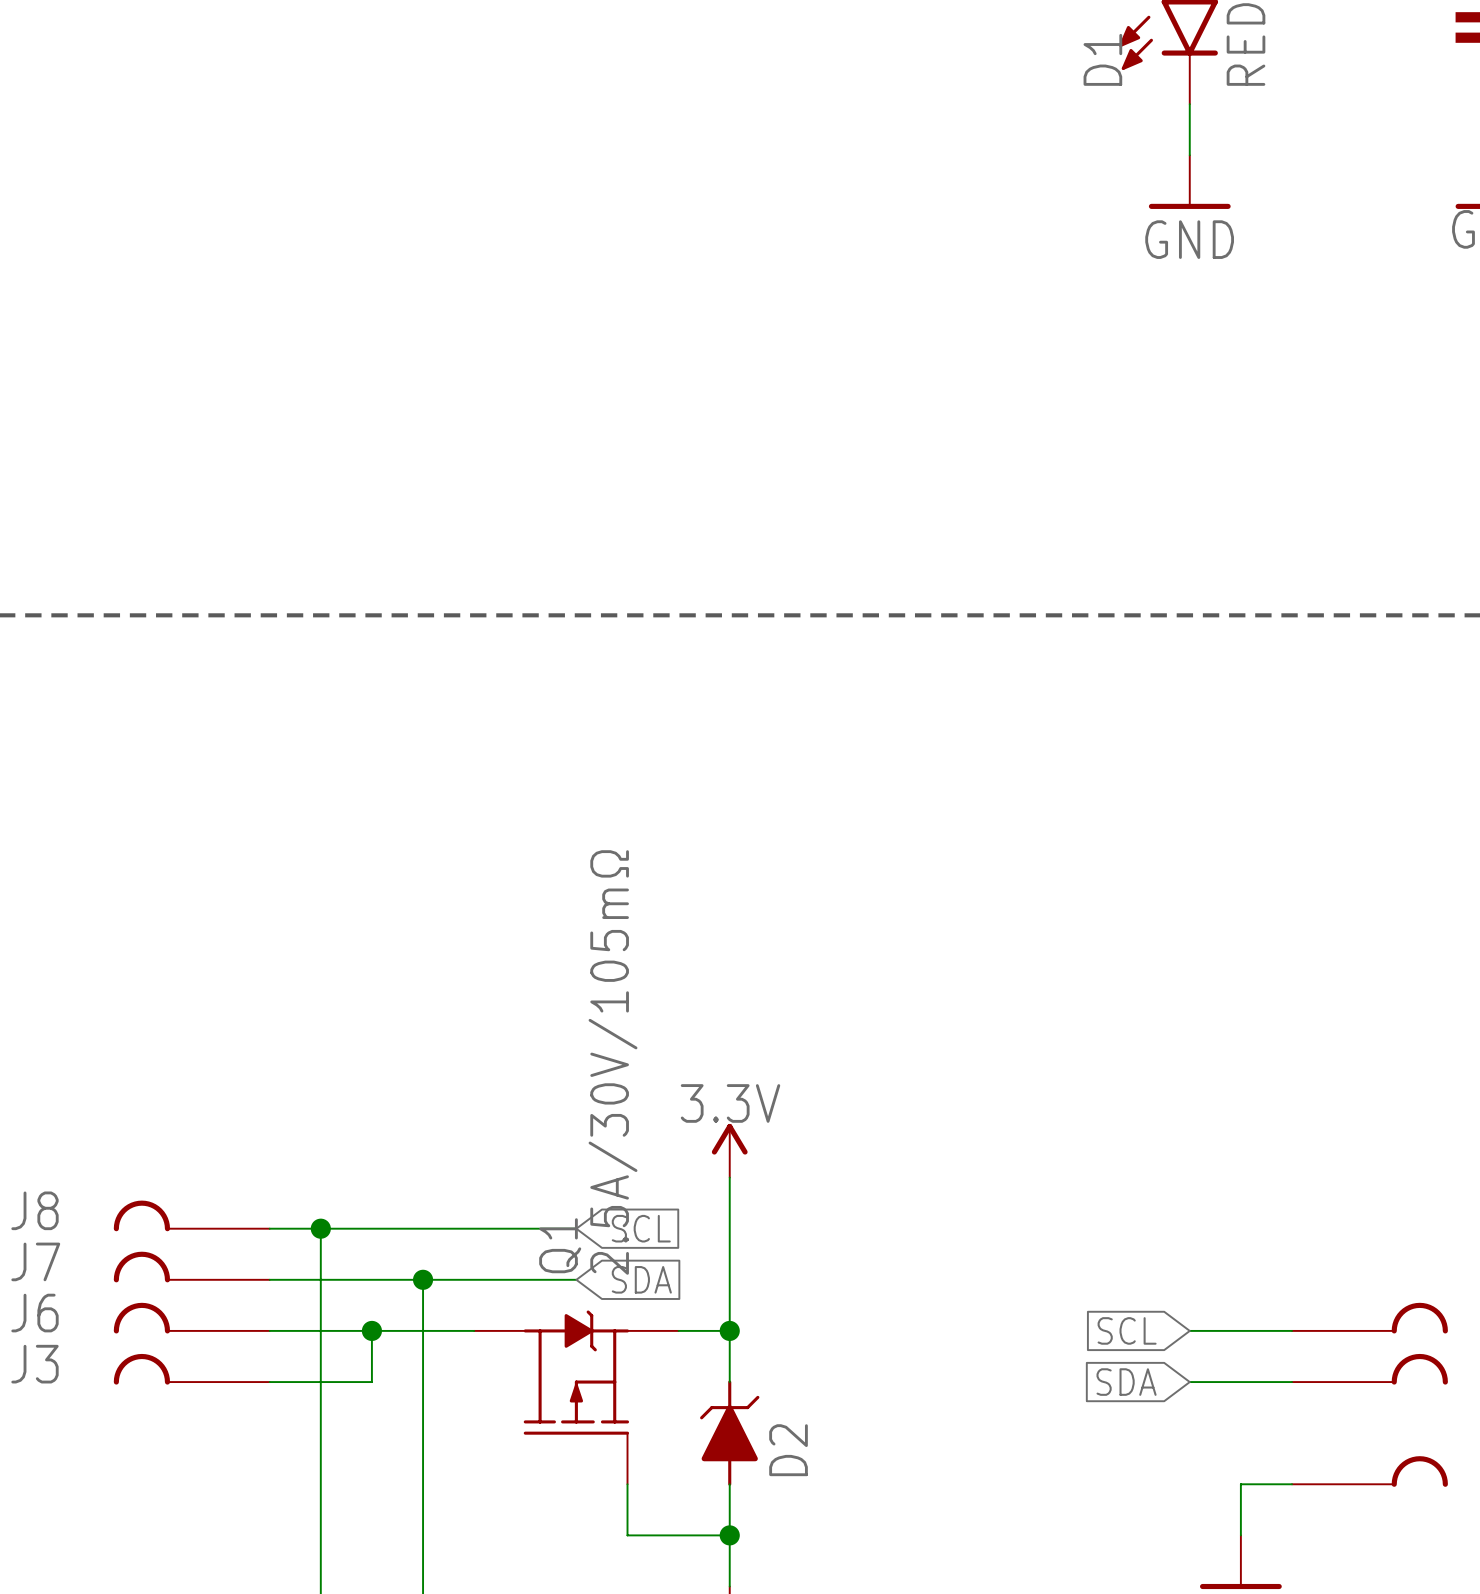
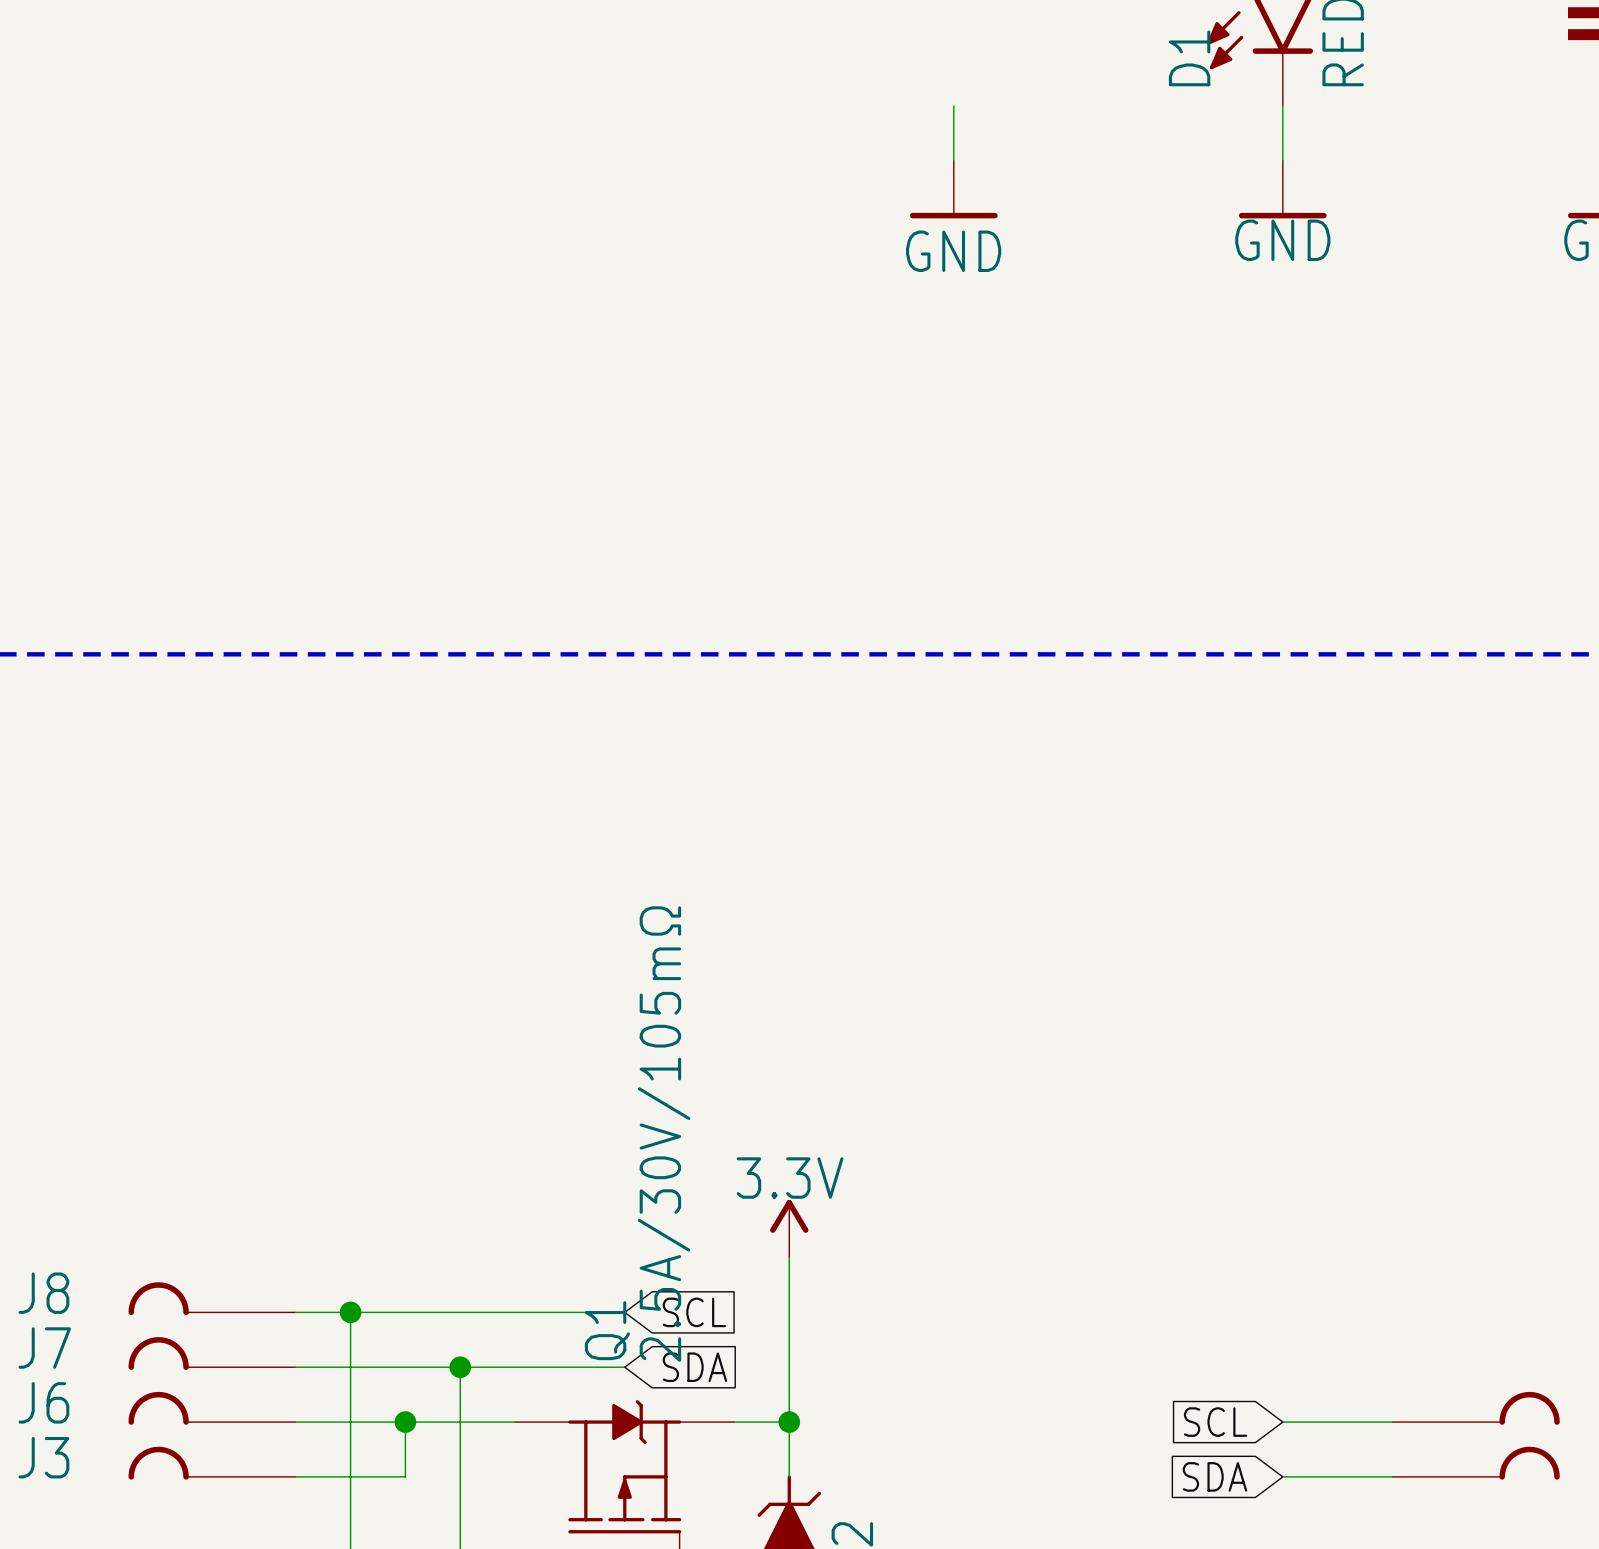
wire: none -> (953, 105) (953, 160)
power symbol: none -> GND (953, 189)
power symbol text position: GND (1189, 239) -> GND (1282, 240)

